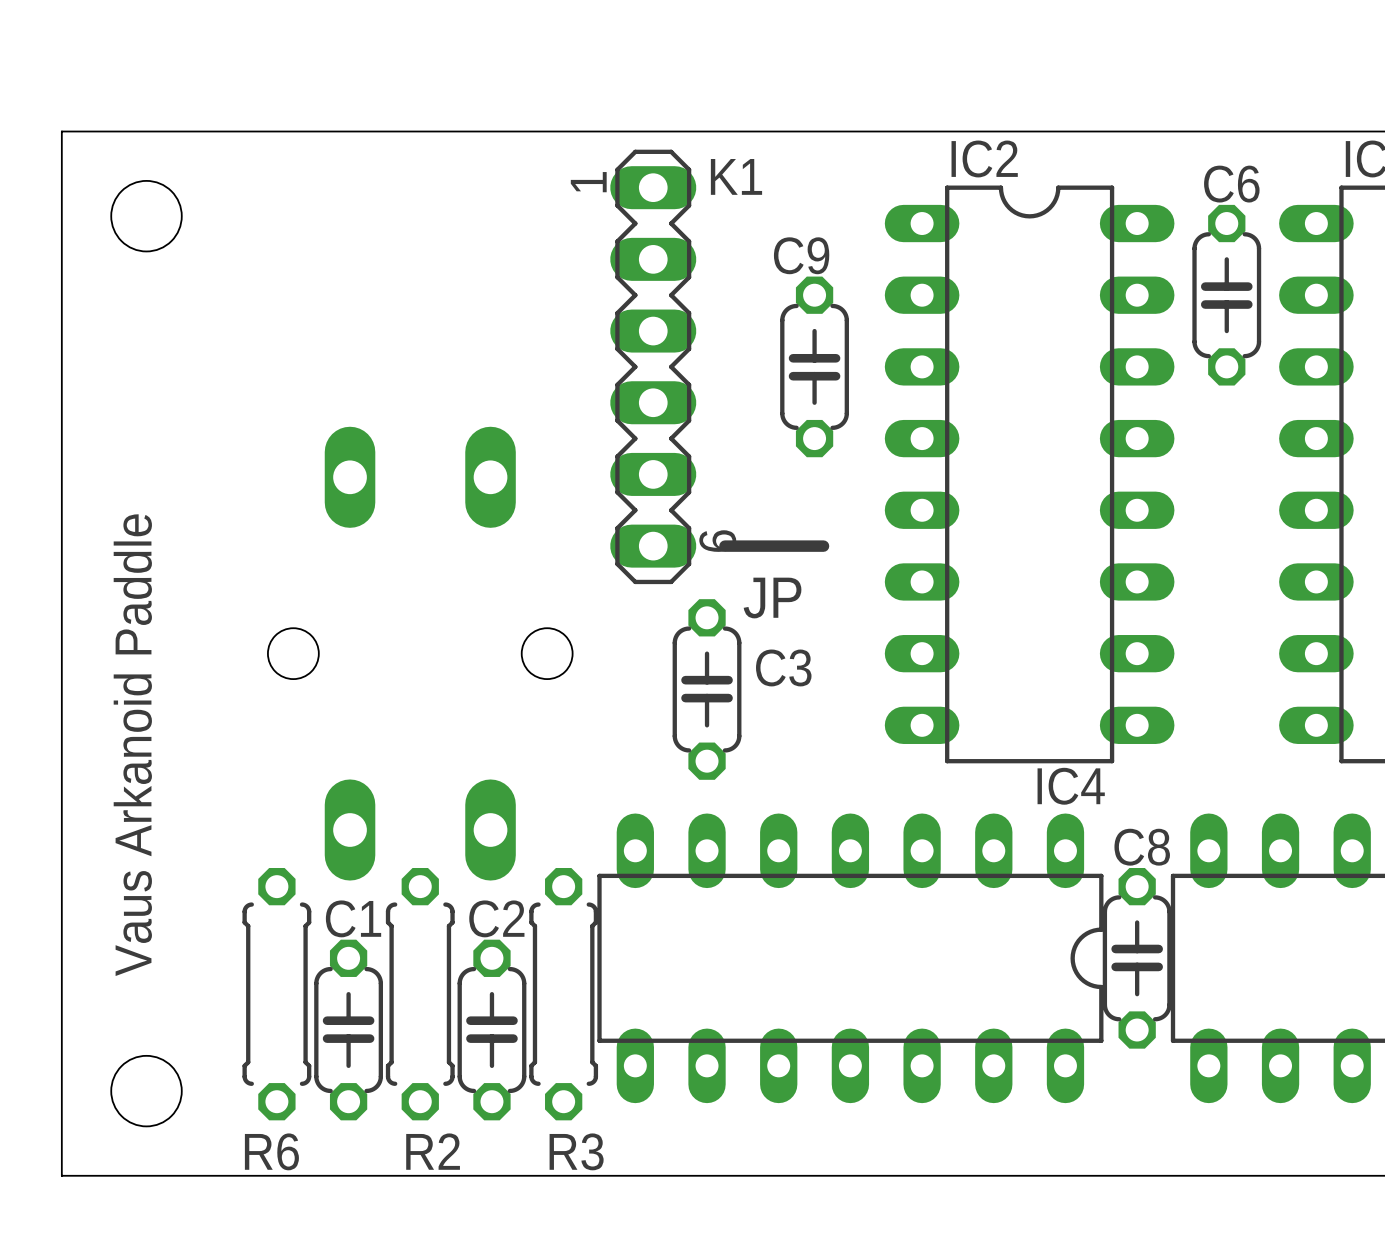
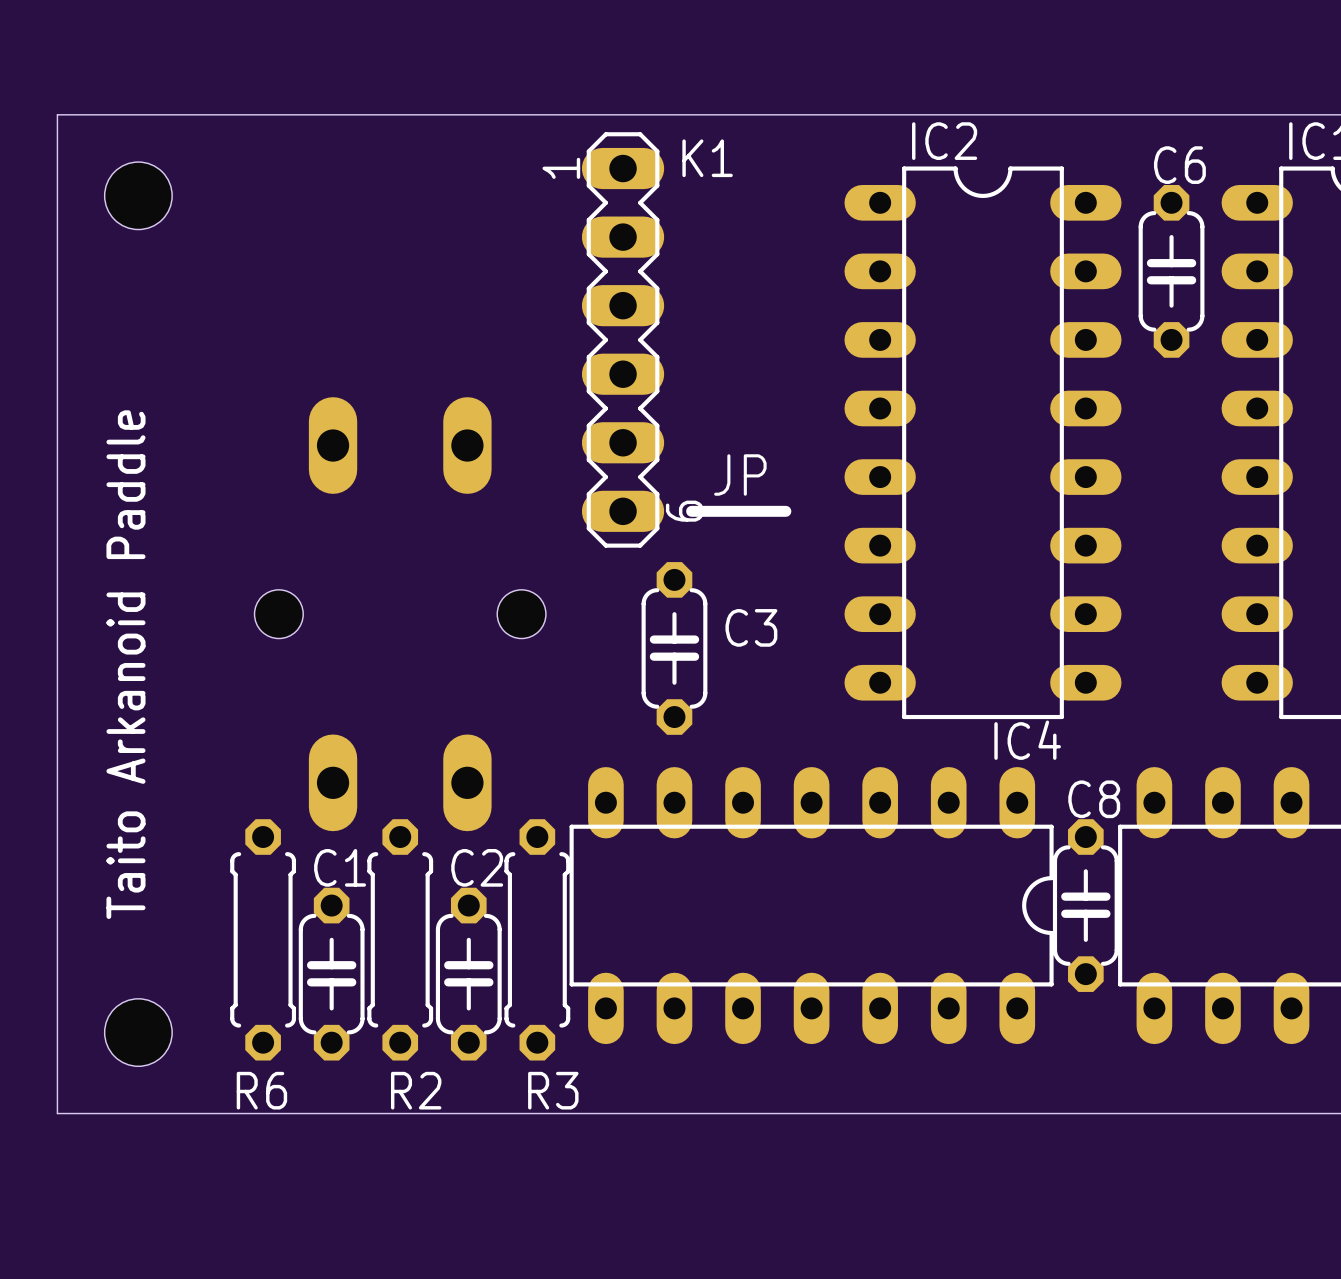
C9: (814, 366) -> none
text position: JP (772, 598) -> JP (740, 475)
text: Vaus Arkanoid Paddle (132, 745) -> Taito Arkanoid Paddle (125, 664)

